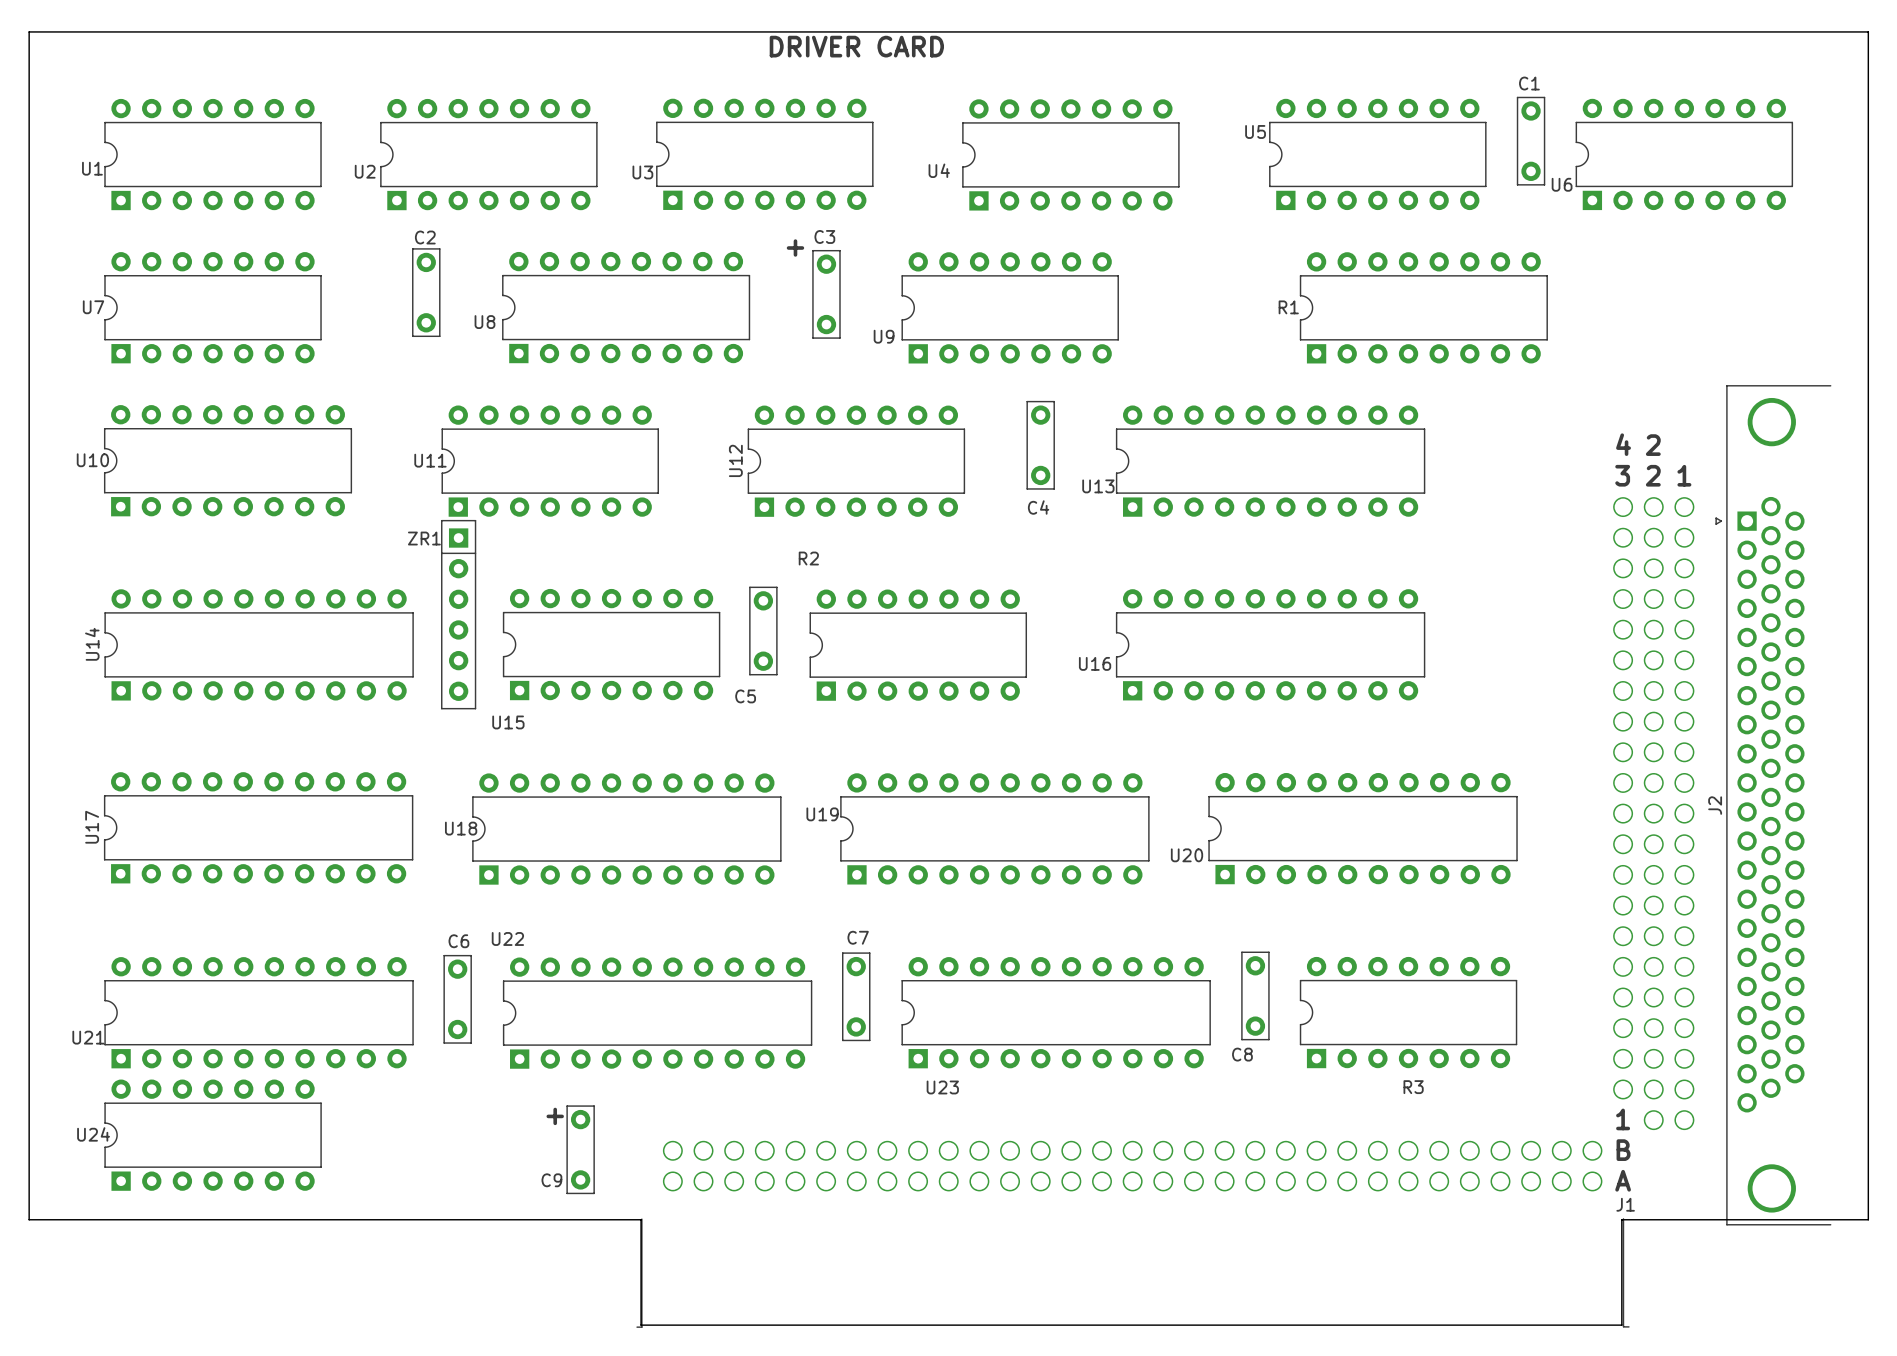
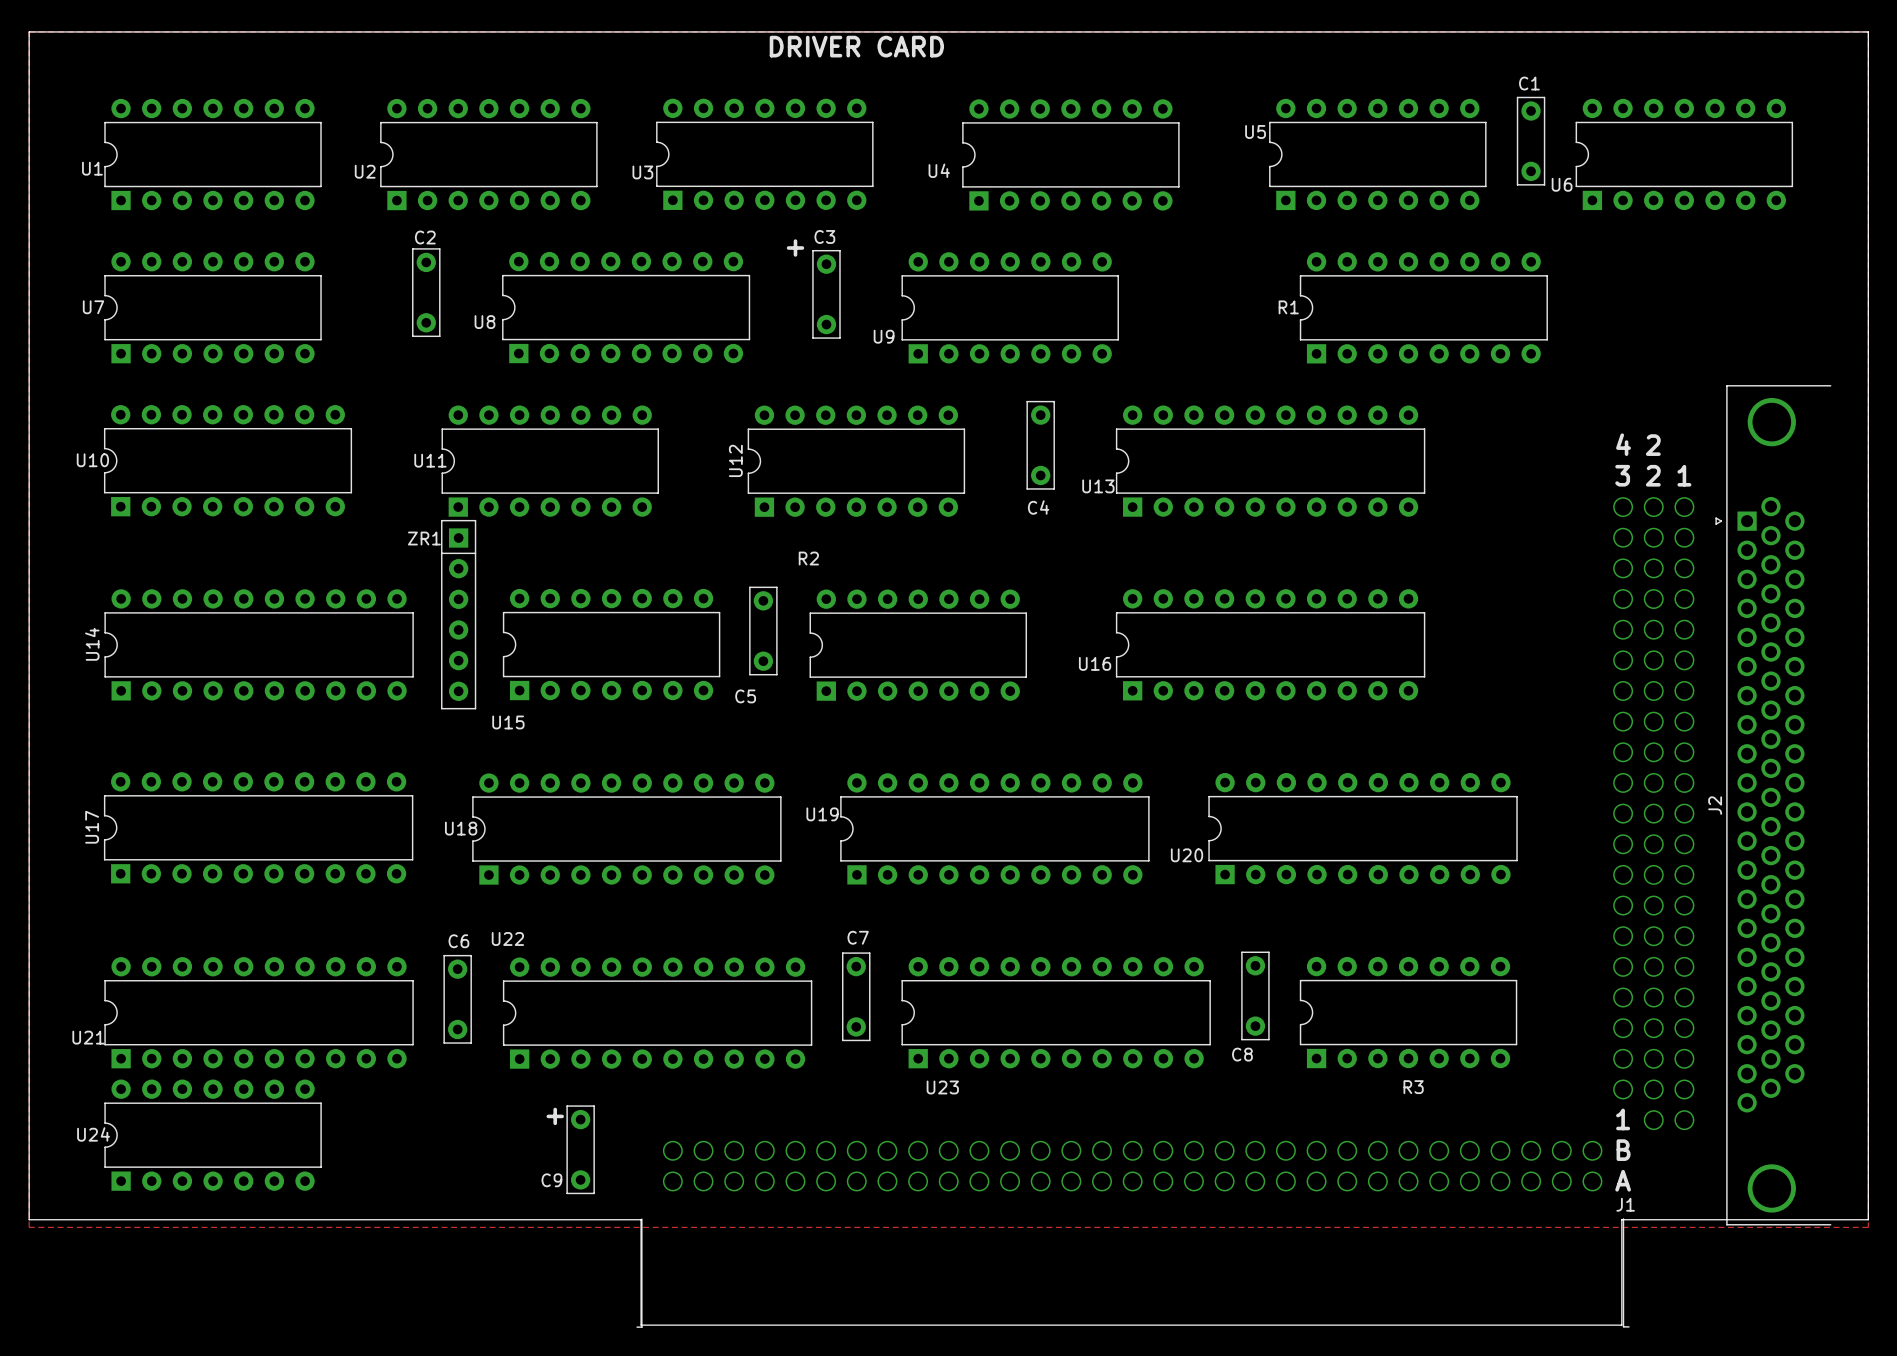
zone outline: none -> (29, 31) (1868, 31) (1868, 1227) (29, 1227) (29, 31)

